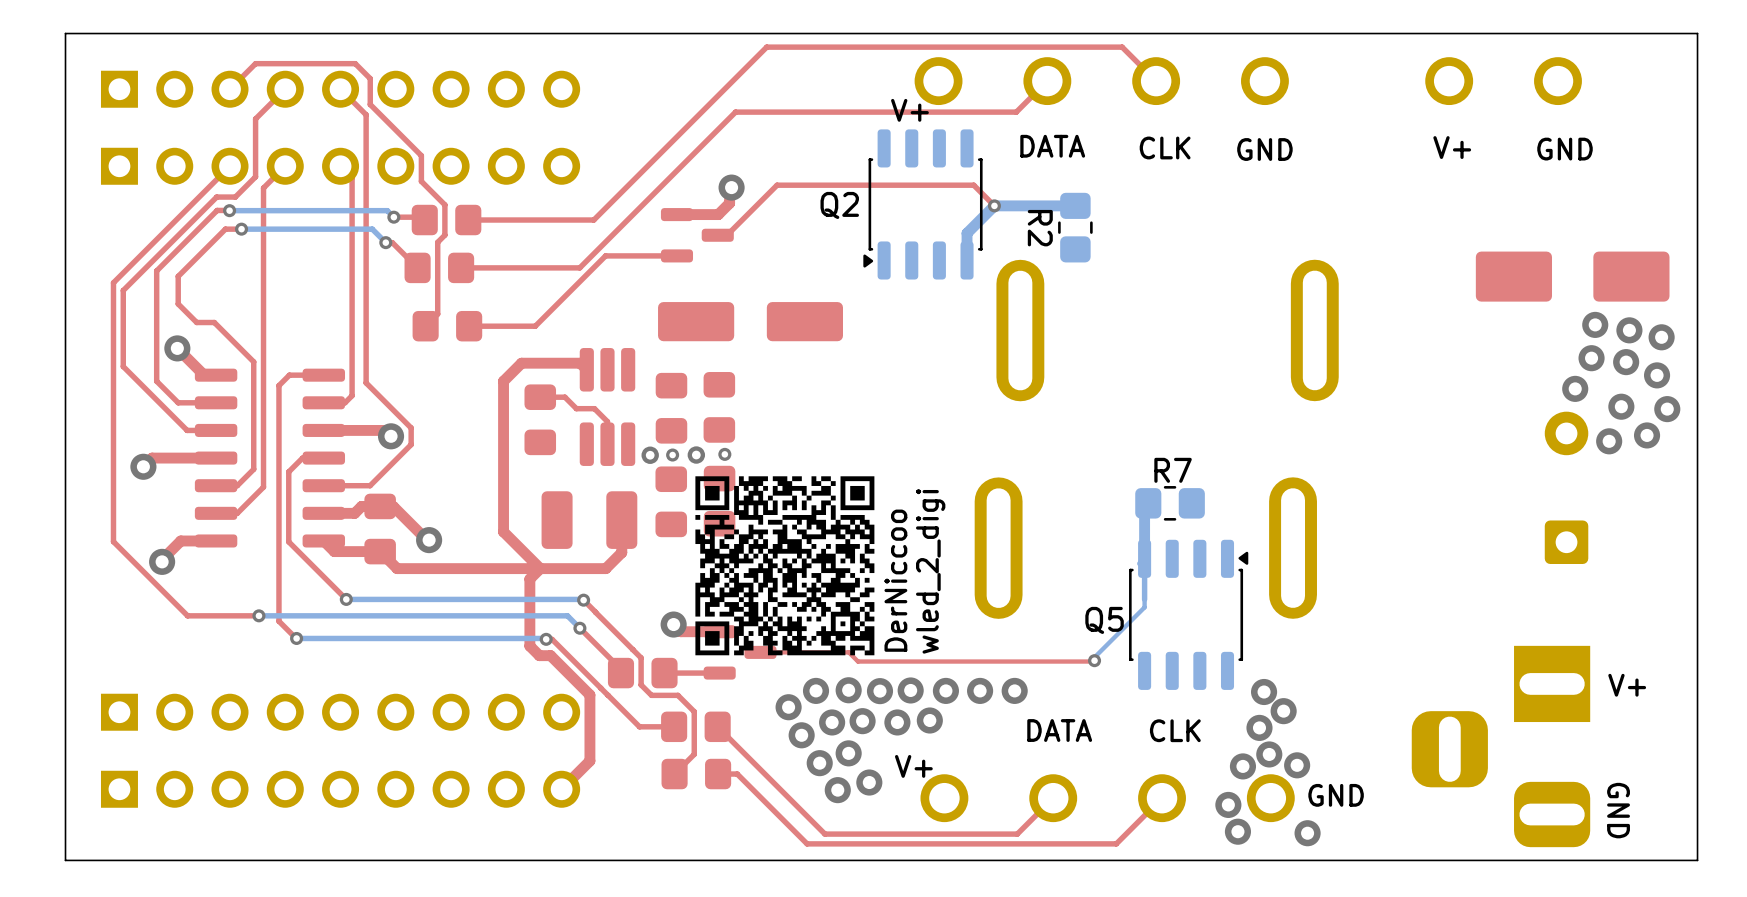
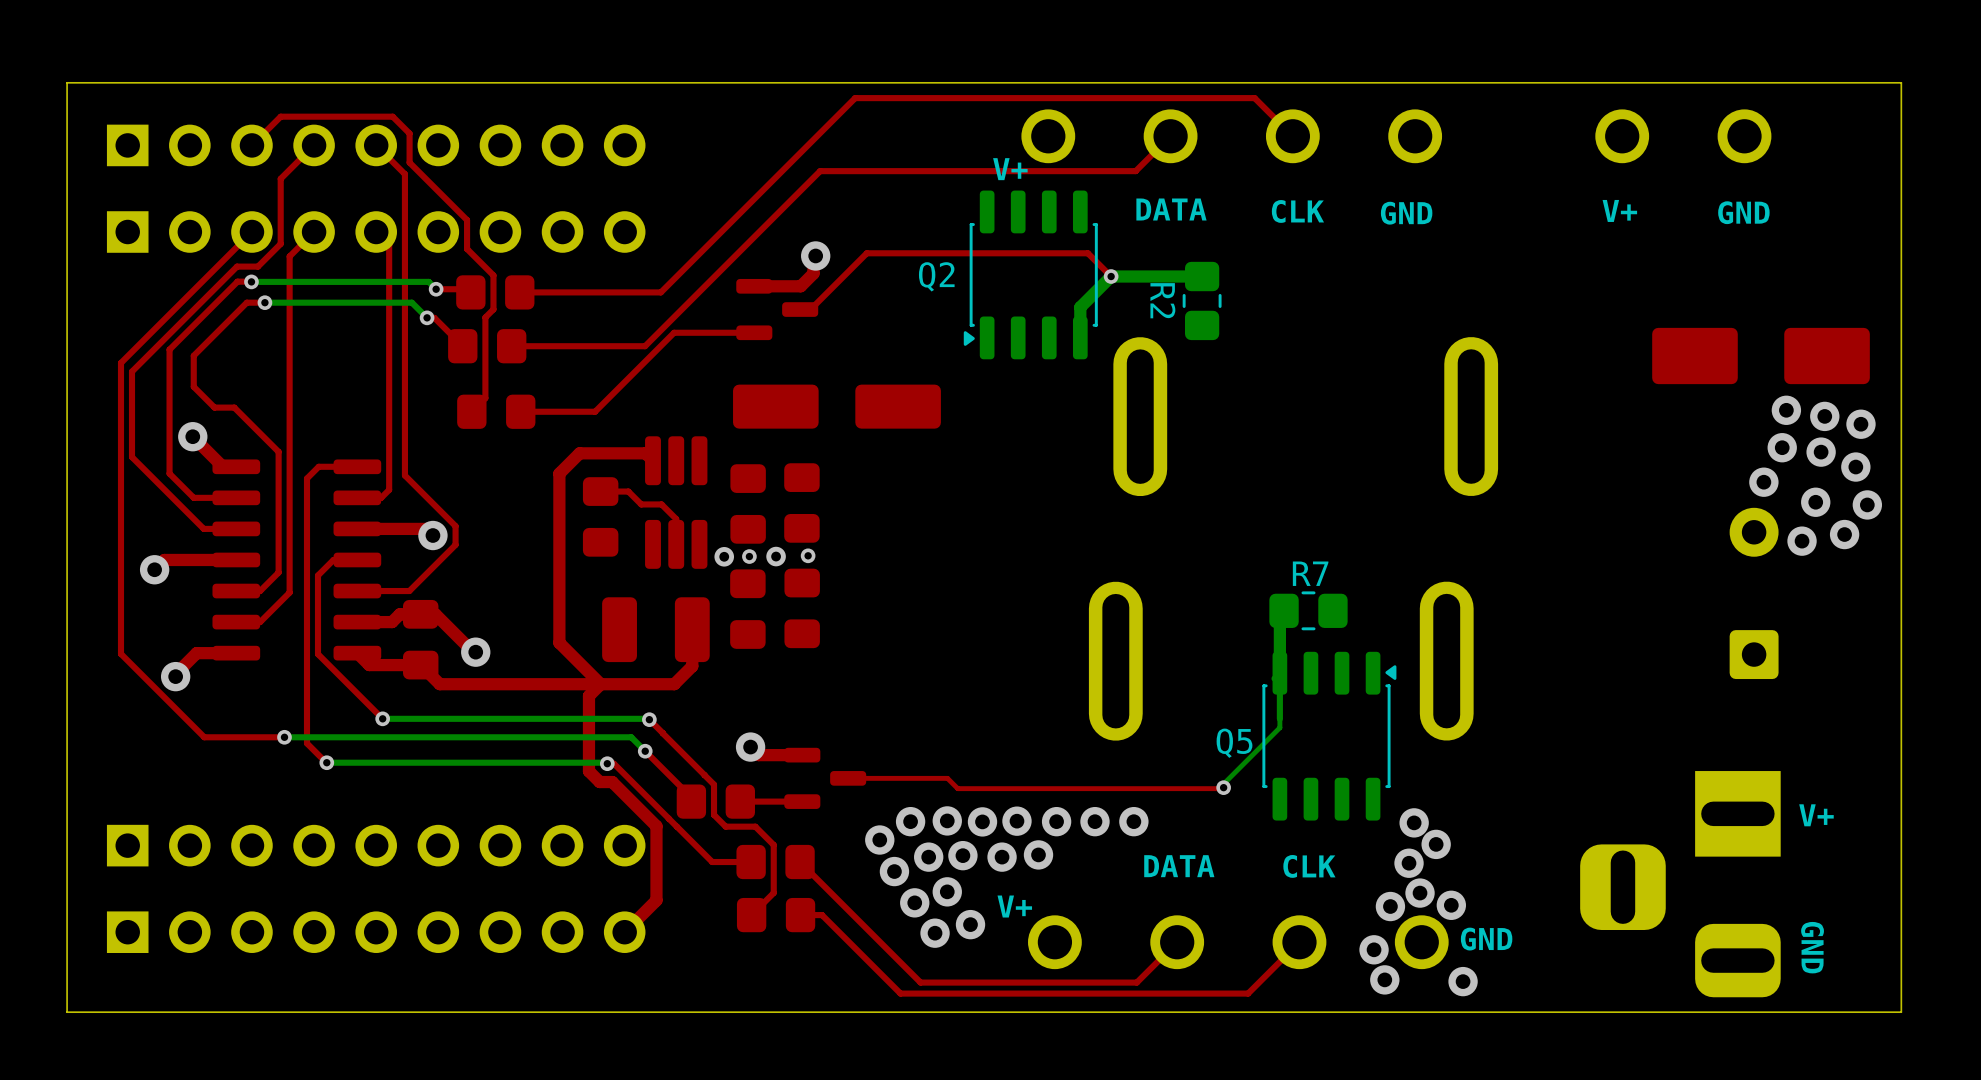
drawing: [695, 476, 875, 656] -> none
text: wled_2_digi (930, 571) -> none
text: DerNiccoo (895, 580) -> none

